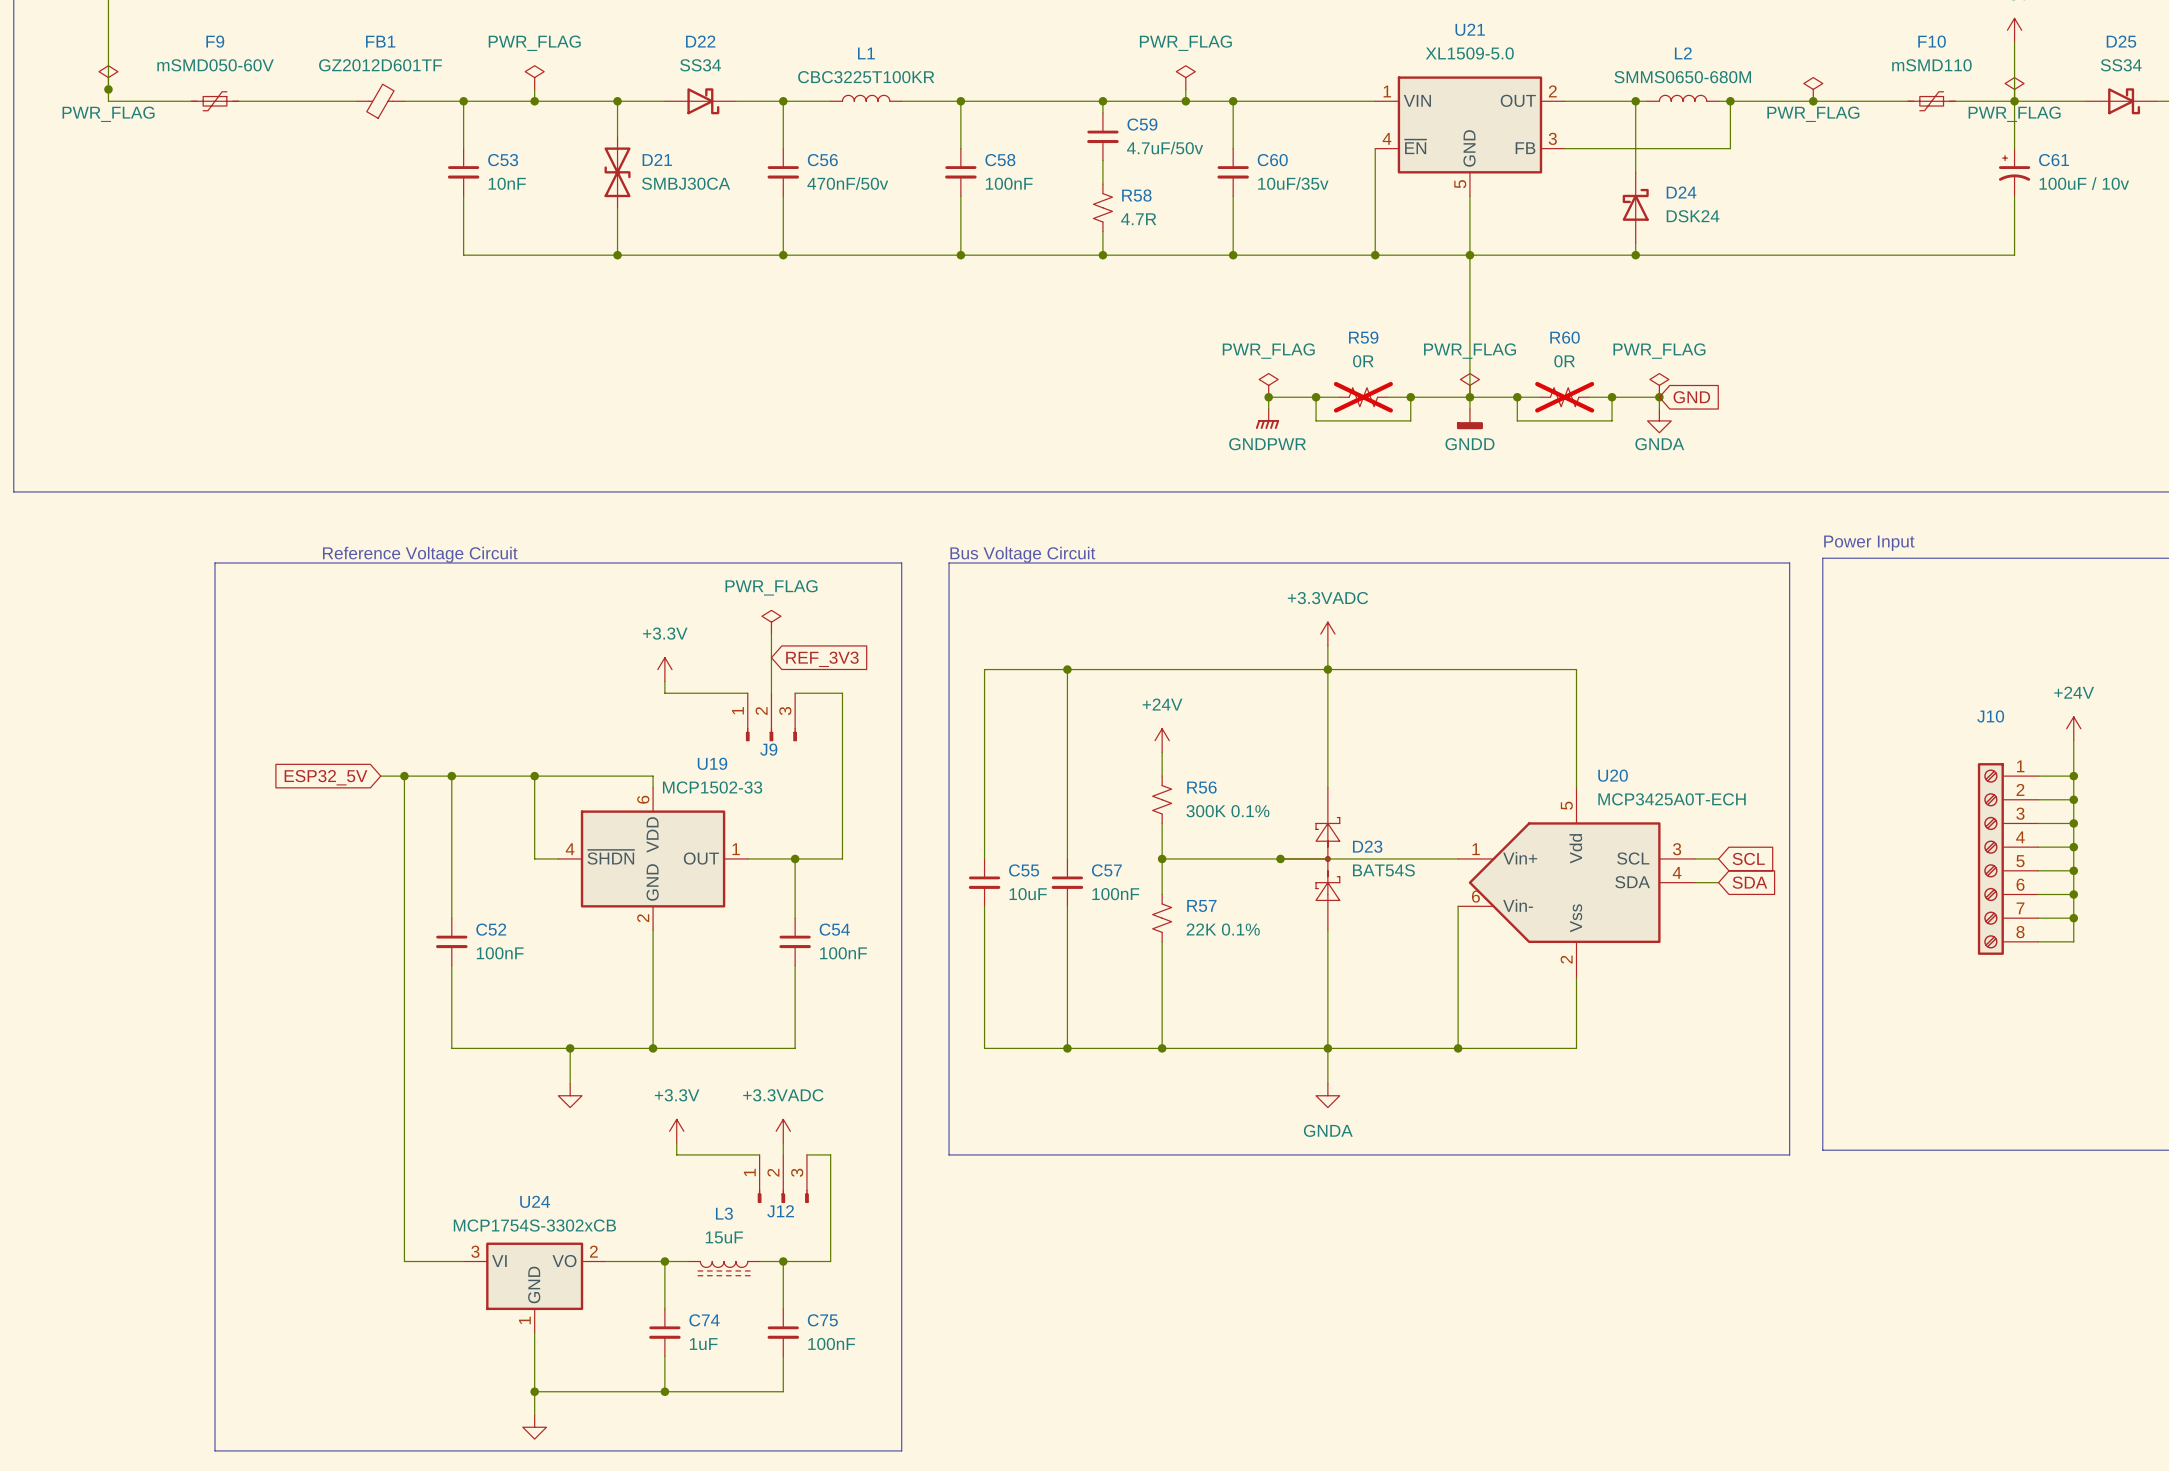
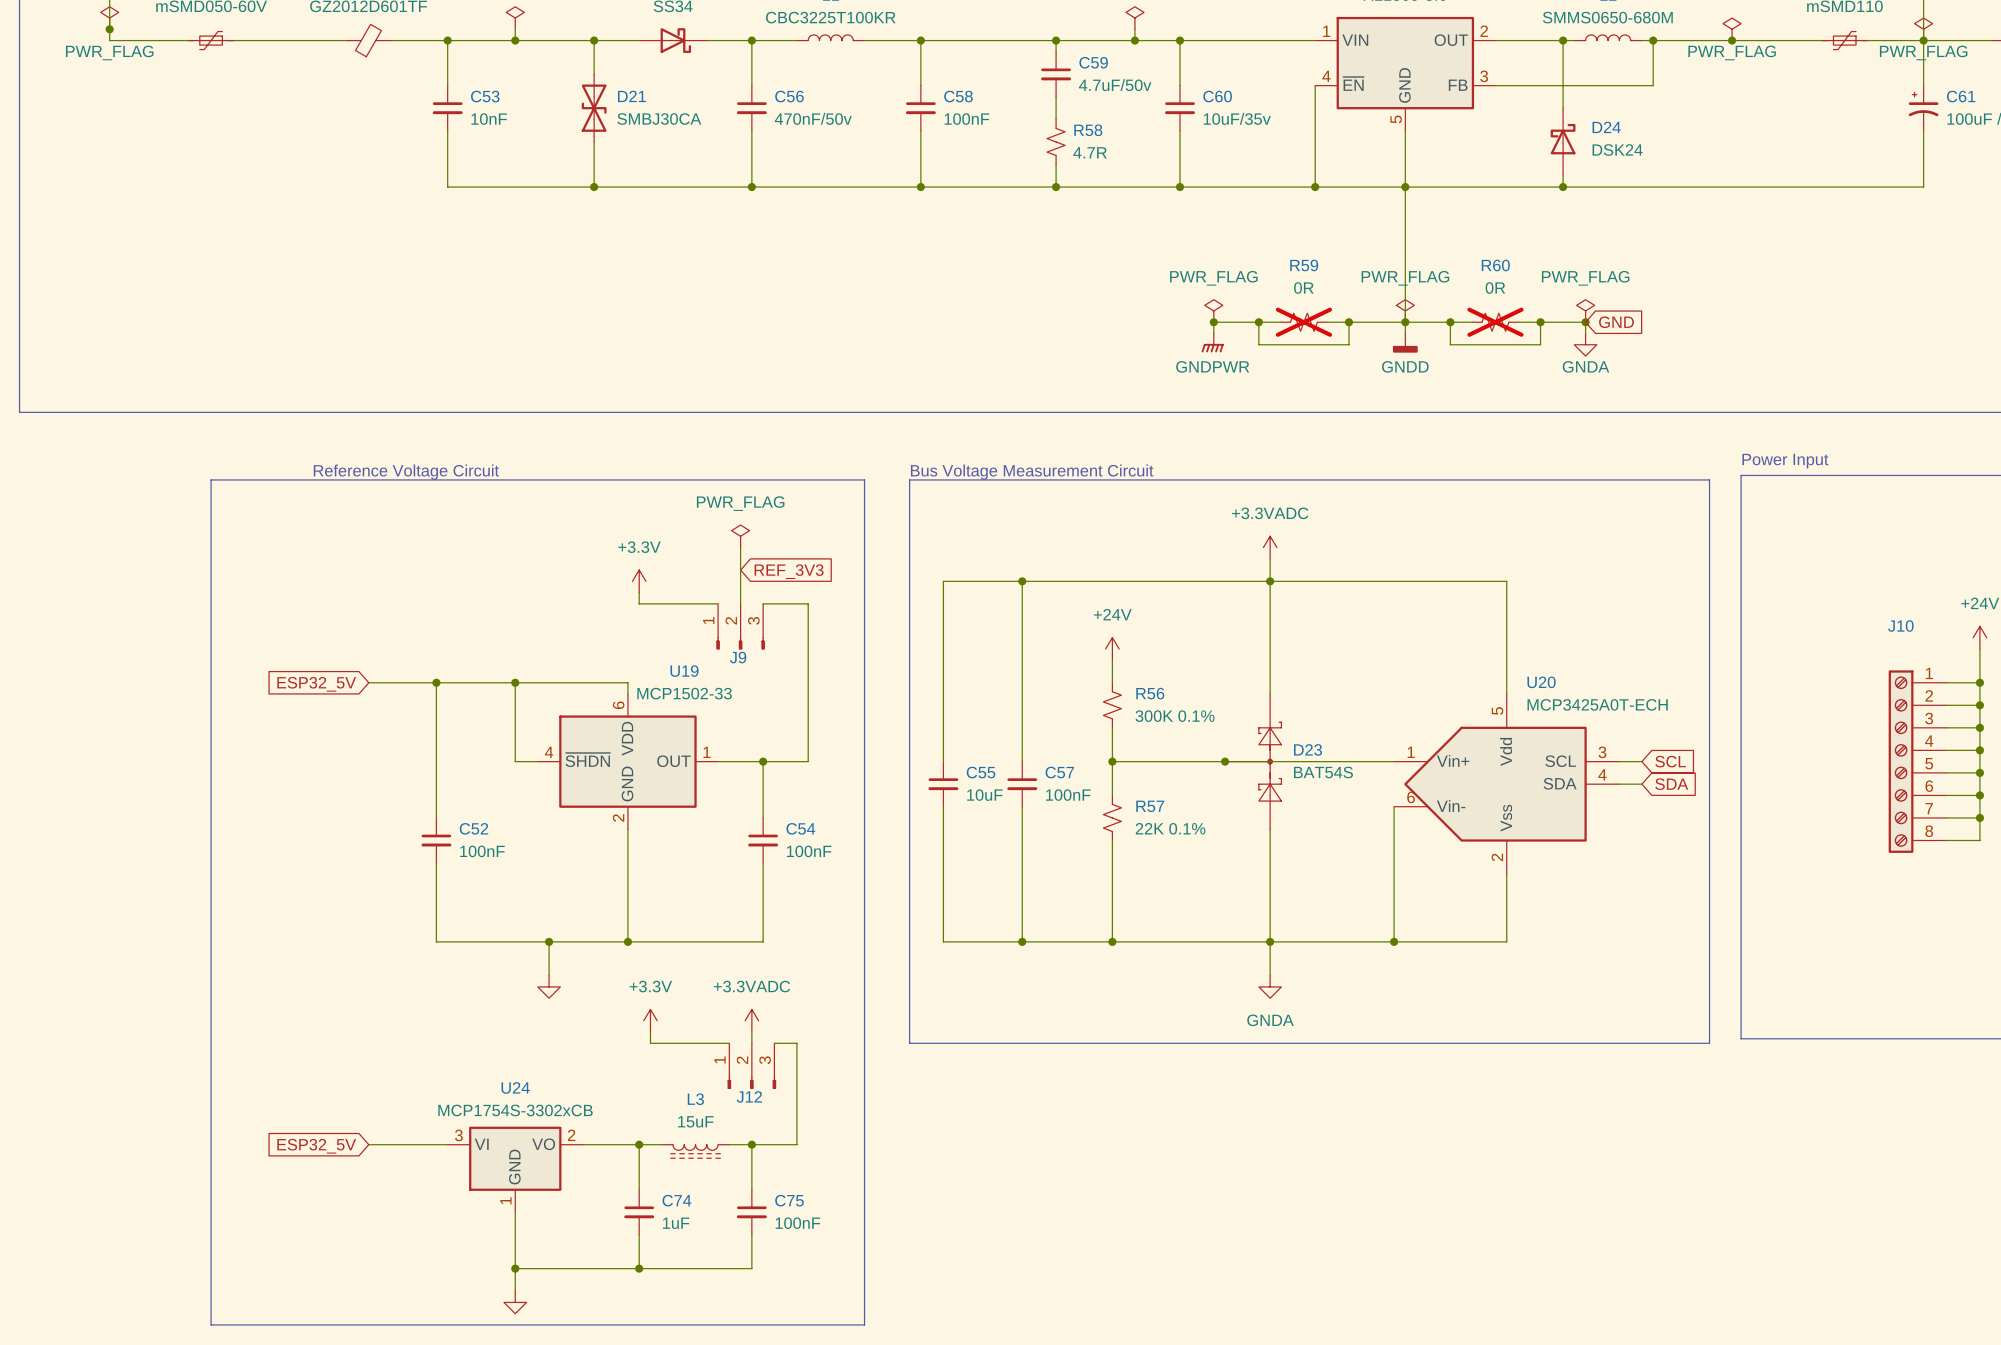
text: Bus Voltage Circuit (1022, 554) -> Bus Voltage Measurement Circuit (1032, 472)
wire: (404, 776) (404, 1261) -> (368, 1144) (391, 1144)
junction: (404, 776) -> none
global label: none -> ESP32_5V (316, 1146)

